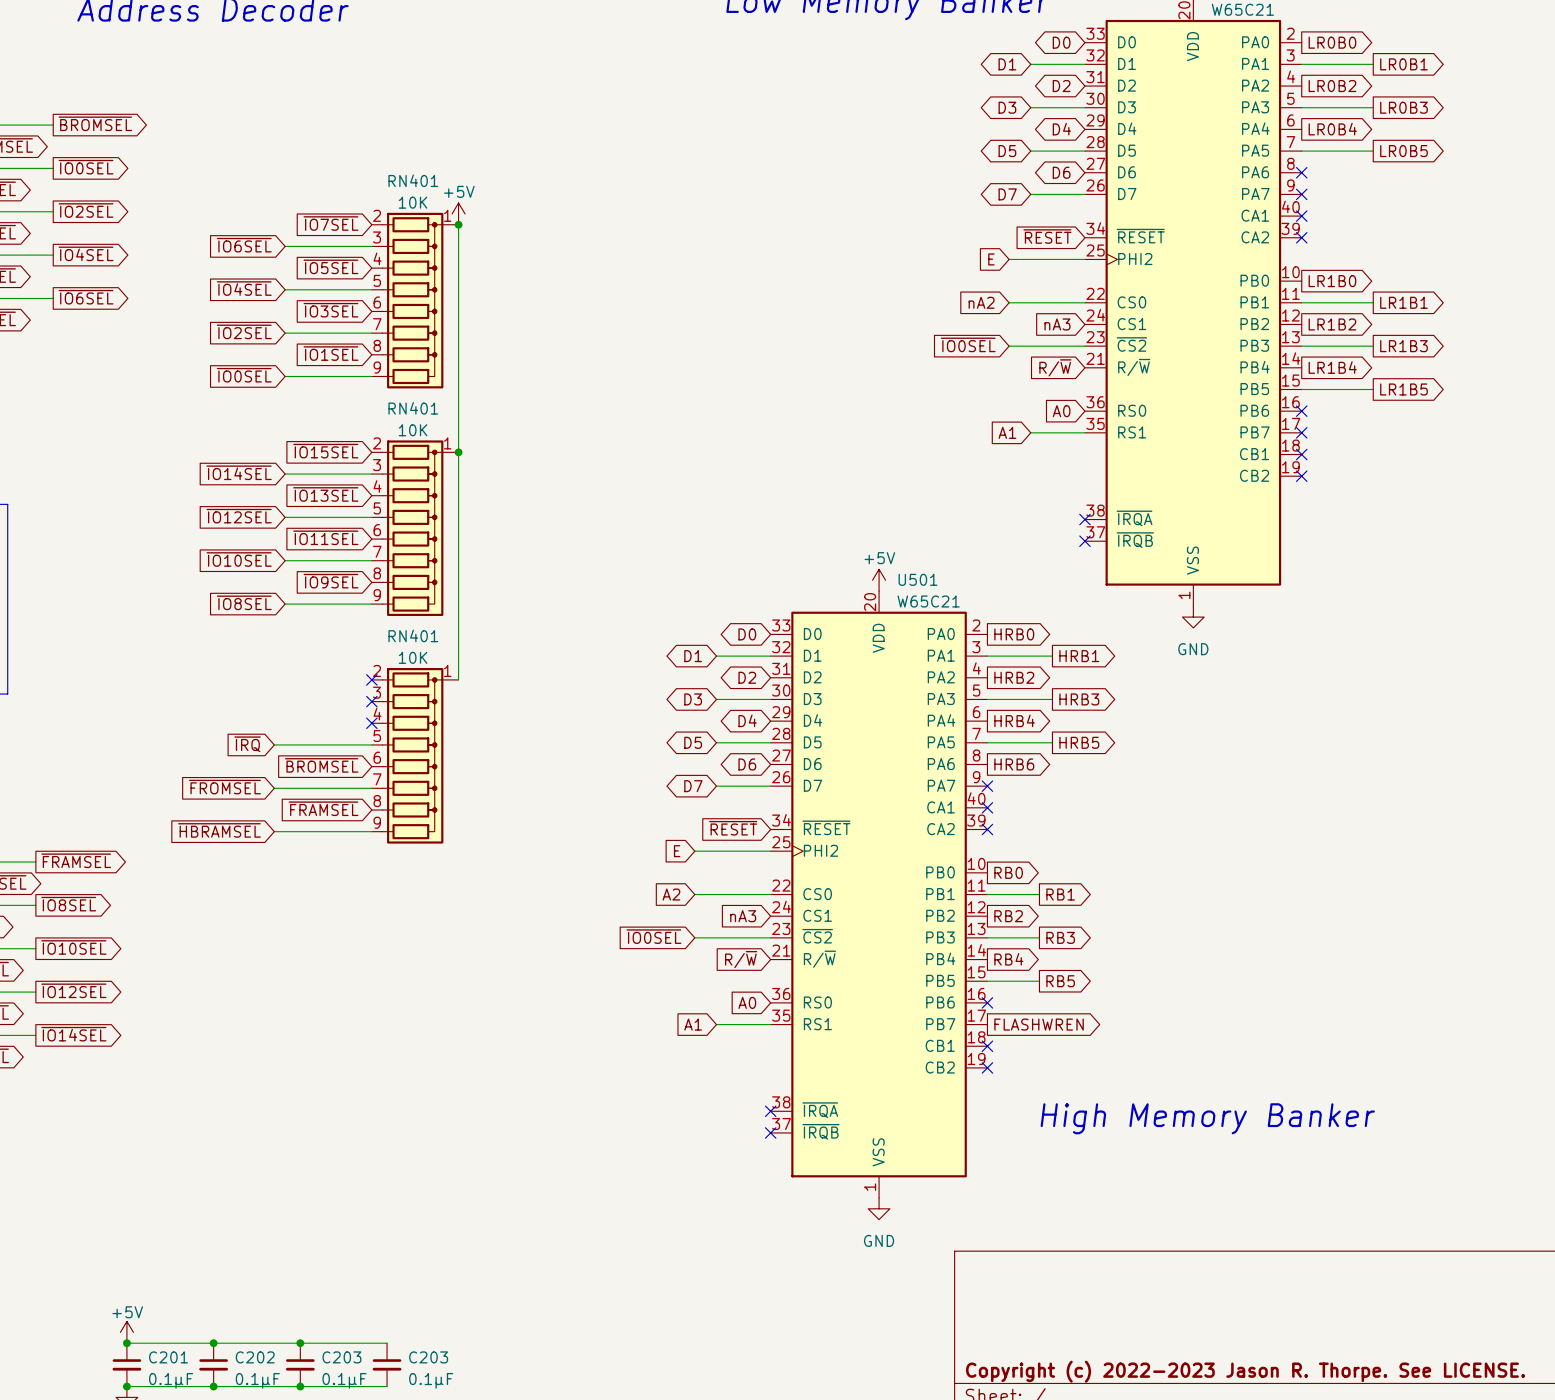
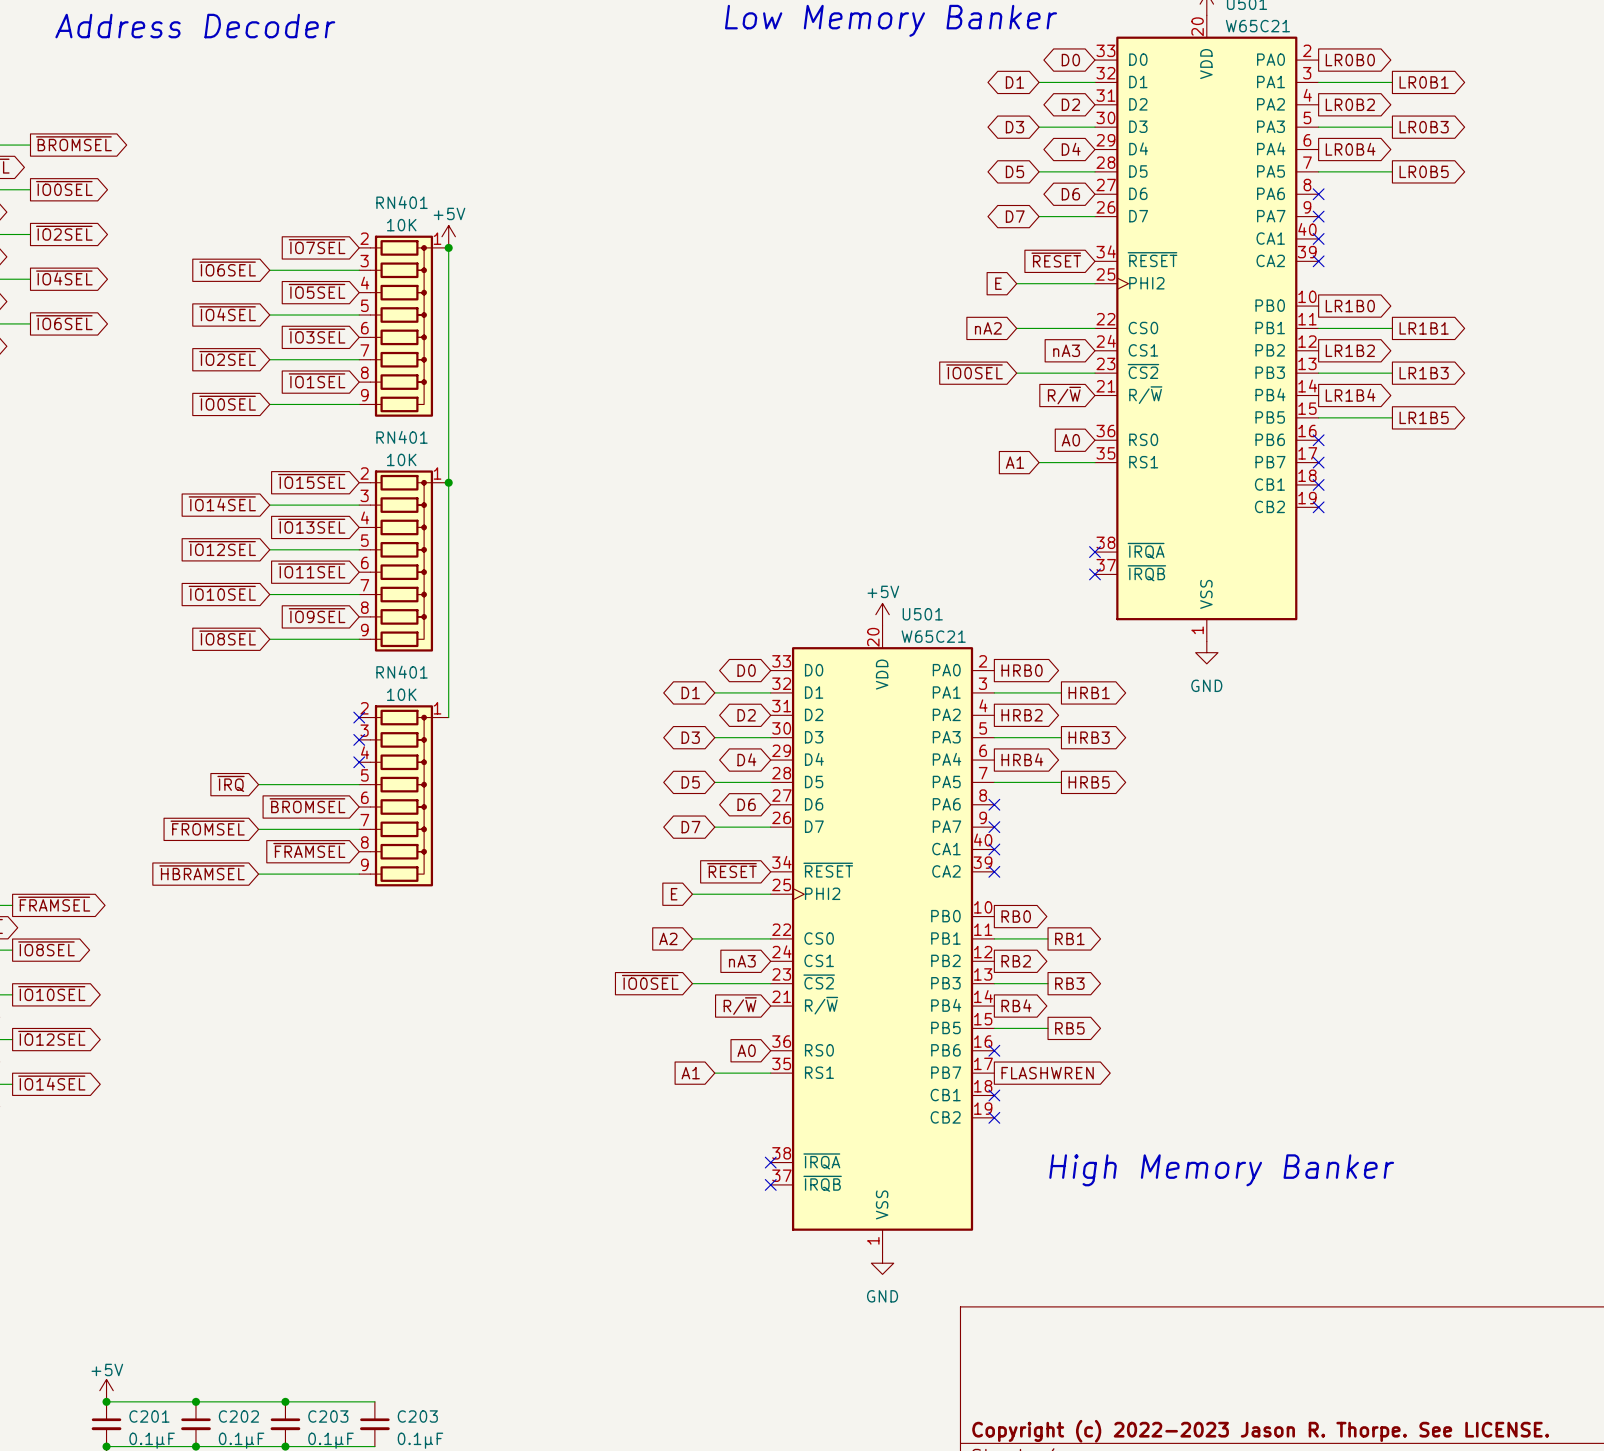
no-connect mark: none -> (994, 804)
global label: HRB6 (1014, 764) -> none

